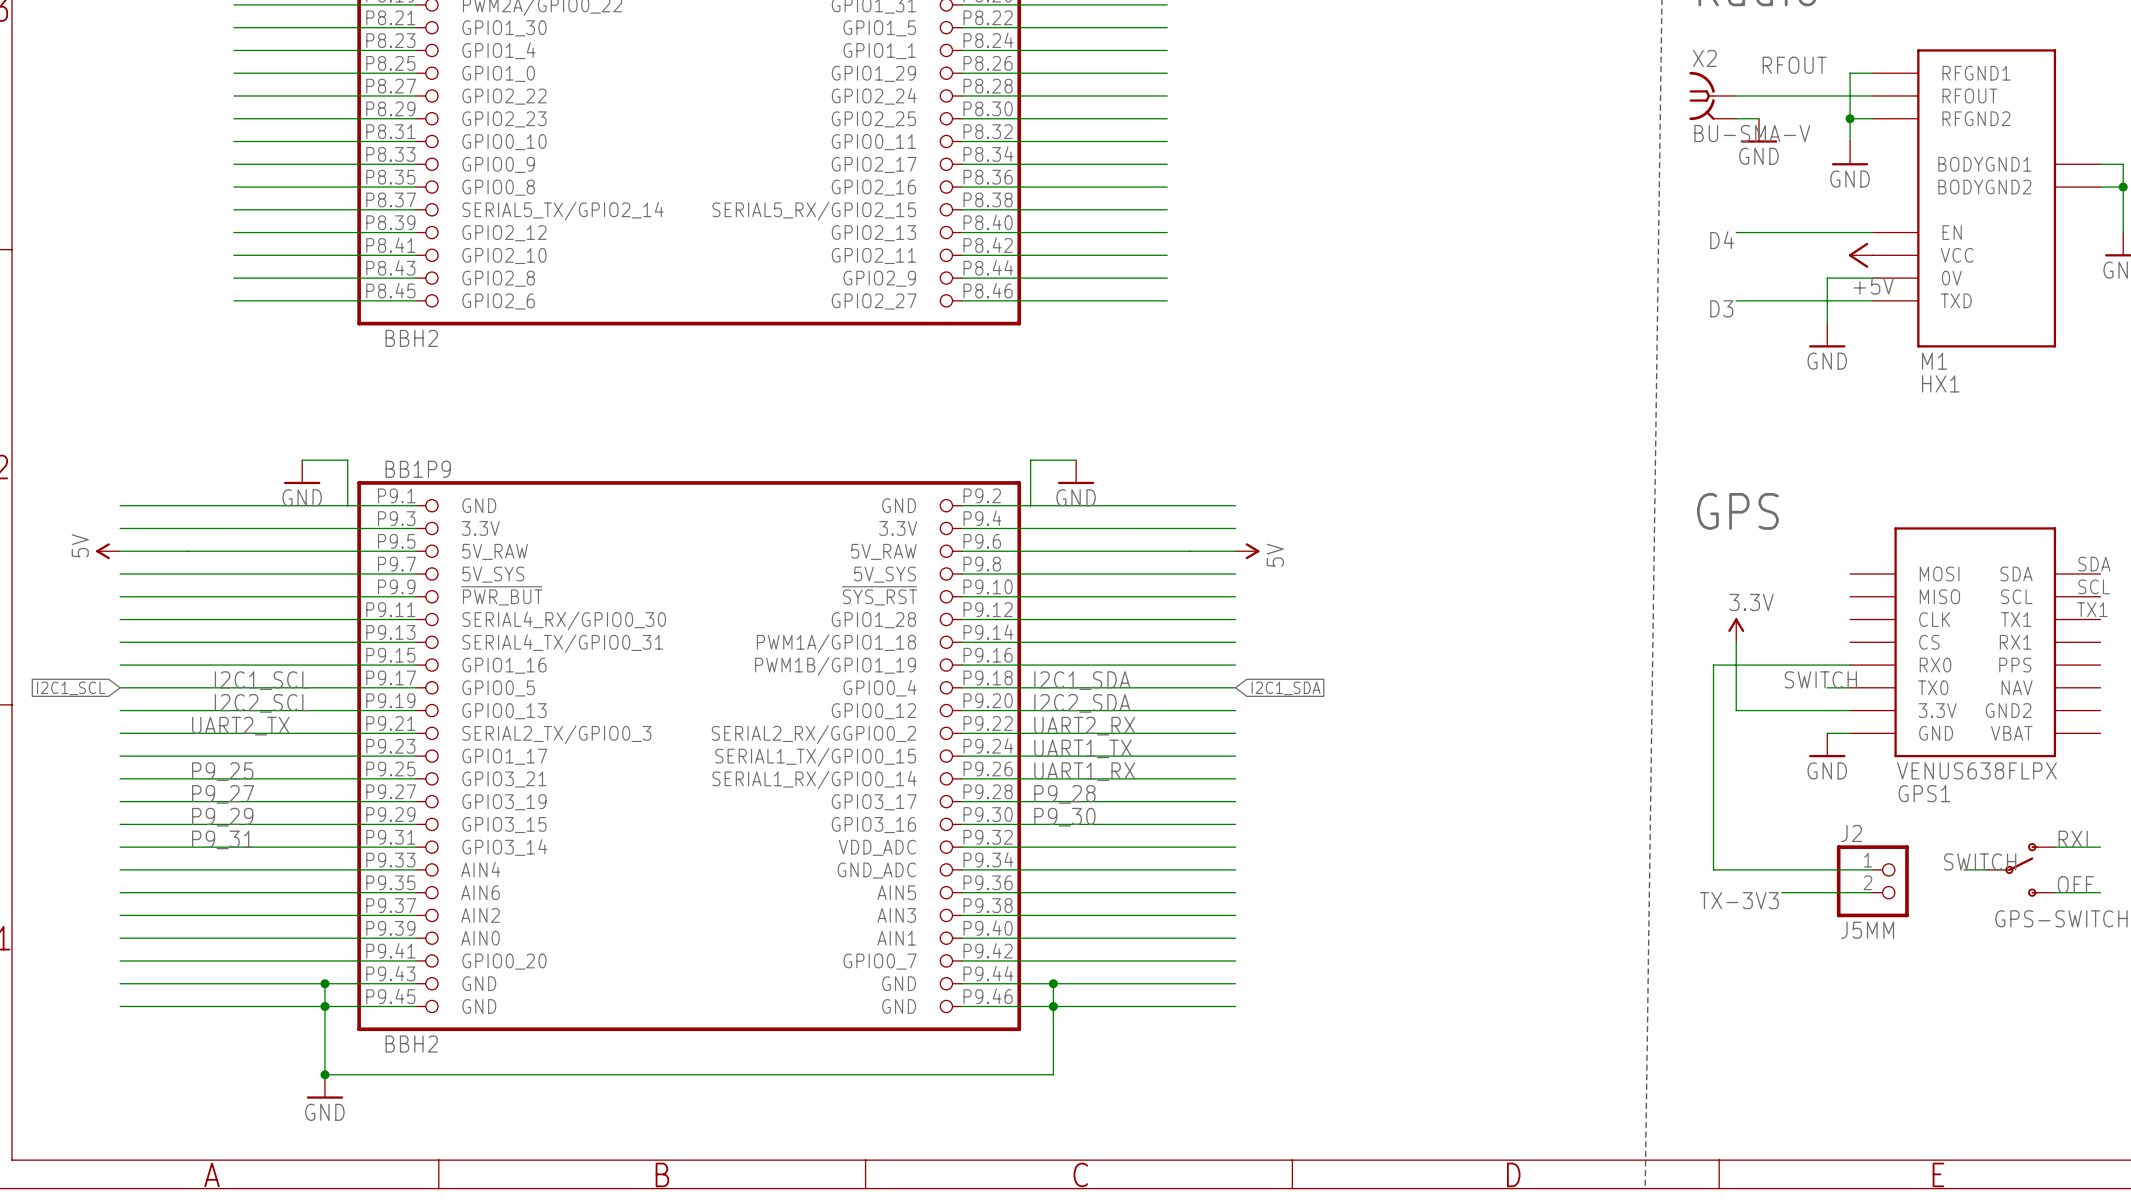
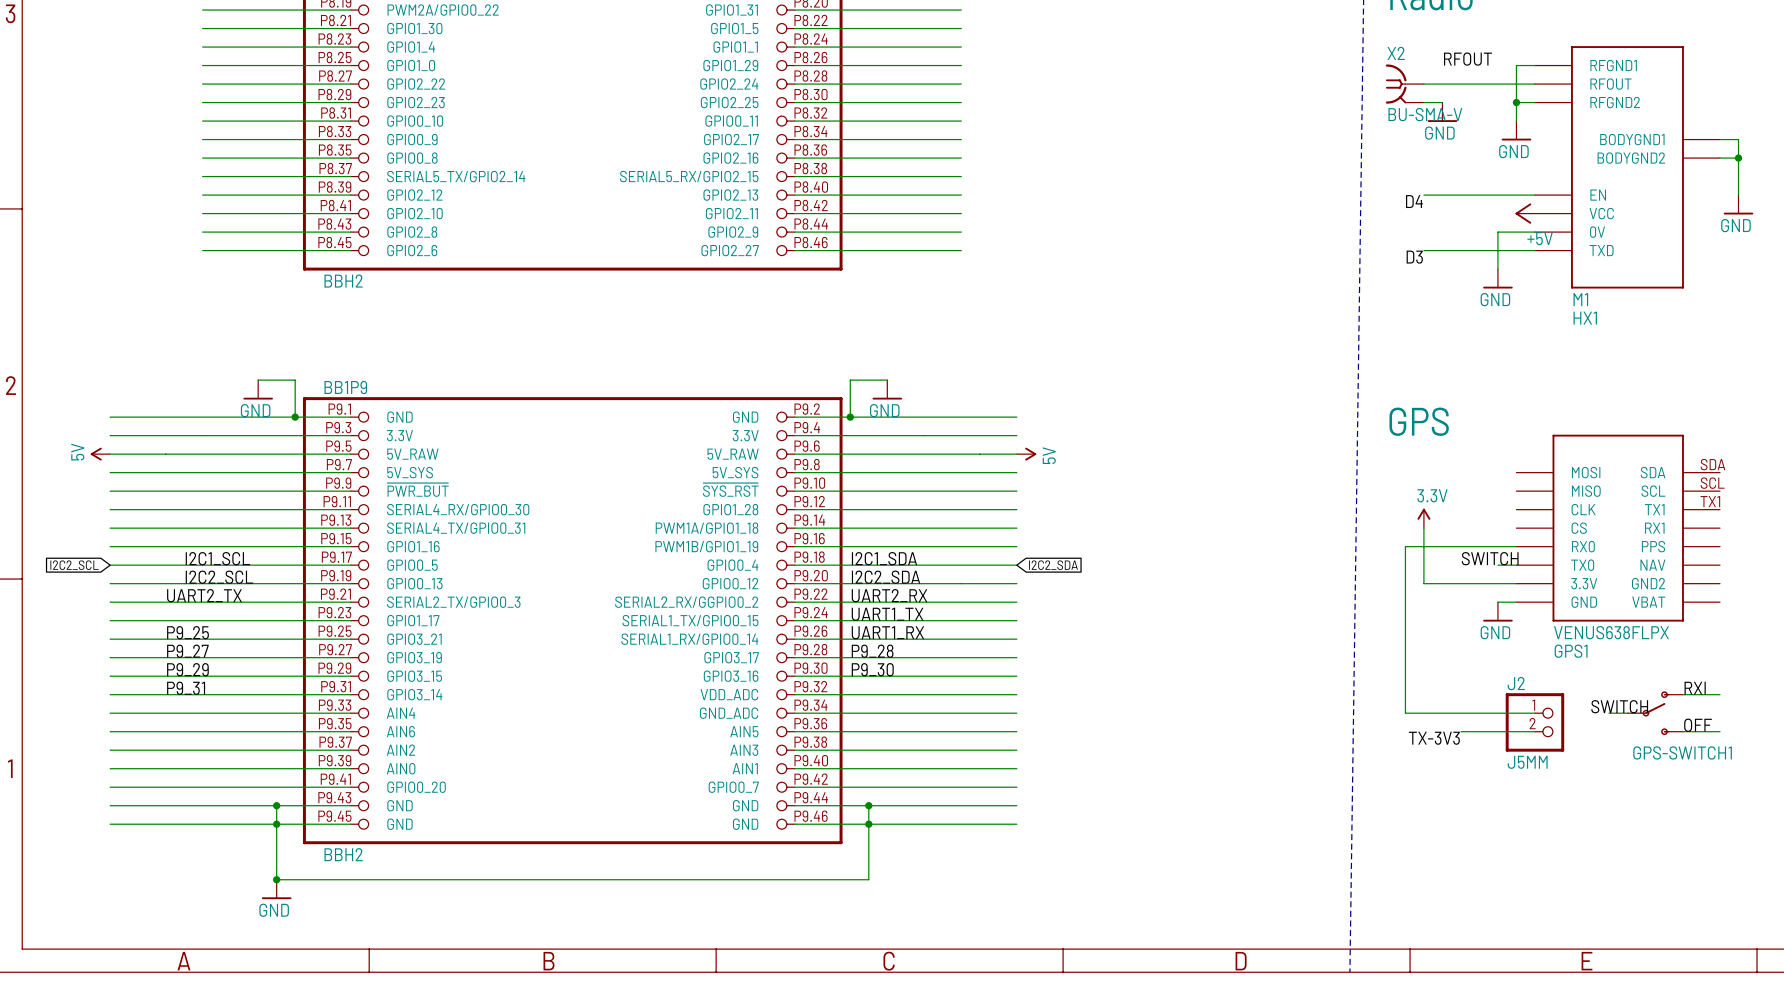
junction: none -> (295, 417)
junction: none -> (850, 417)
global label: I2C1_SCL (71, 688) -> I2C2_SCL (74, 565)
global label: I2C1_SDA (1286, 688) -> I2C2_SDA (1053, 565)

